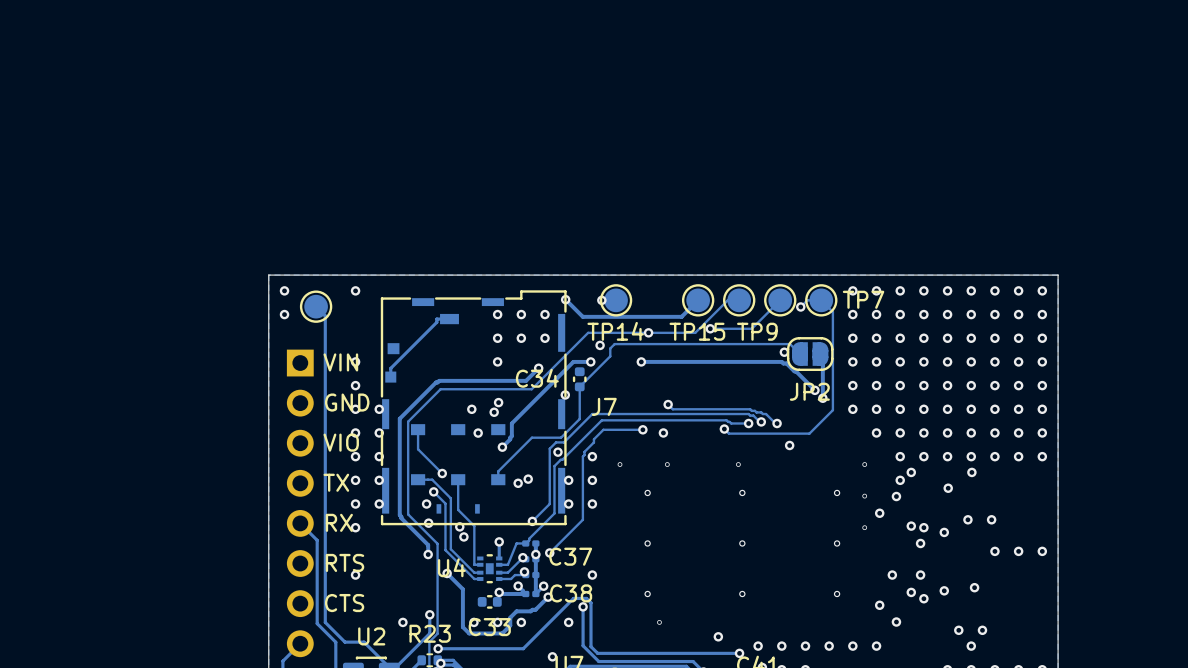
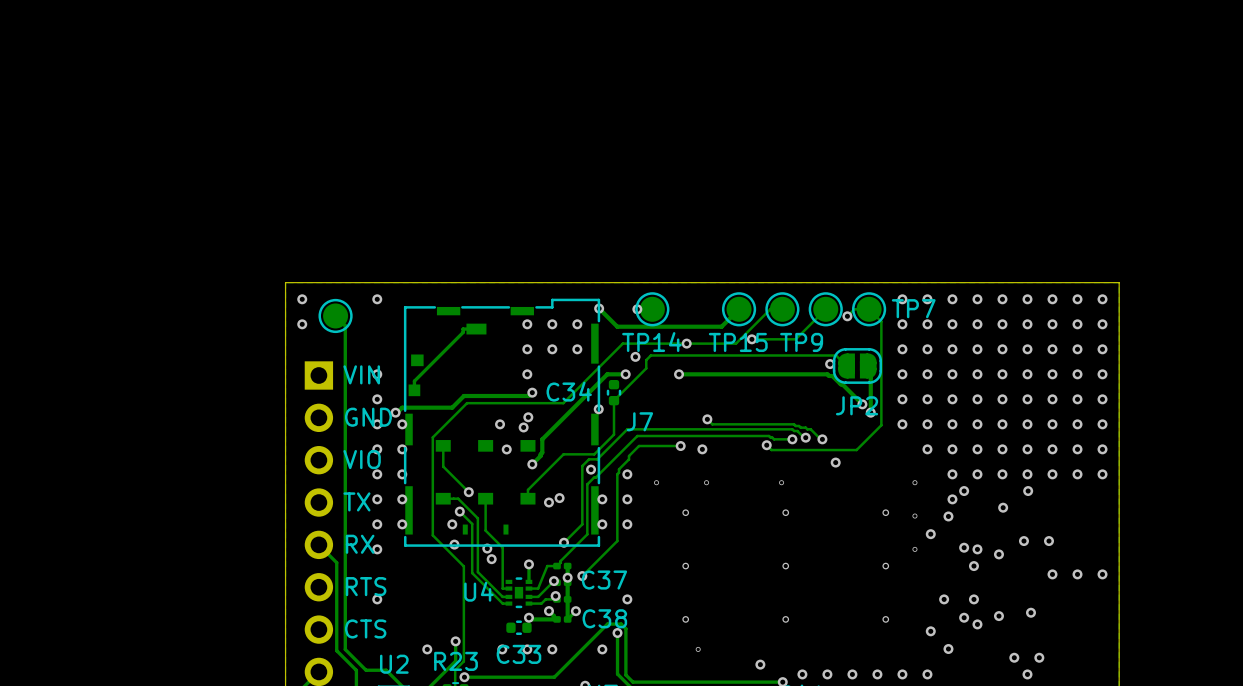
track: (538, 368) (526, 380) (439, 380) (399, 418) (399, 515) (428, 545) (428, 554) -> none
via position: (538, 368) -> (532, 392)
track: none -> (532, 392) (528, 396) (463, 396) (452, 407) (402, 407) (395, 412)
via: none -> (395, 412)
via: (428, 554) -> none
track: (447, 573) (462, 589) (462, 627) (469, 633) (502, 633) (510, 625) (510, 617) (516, 611) (535, 609) (548, 597) -> none
via: (447, 573) -> none
via: (548, 597) -> none

